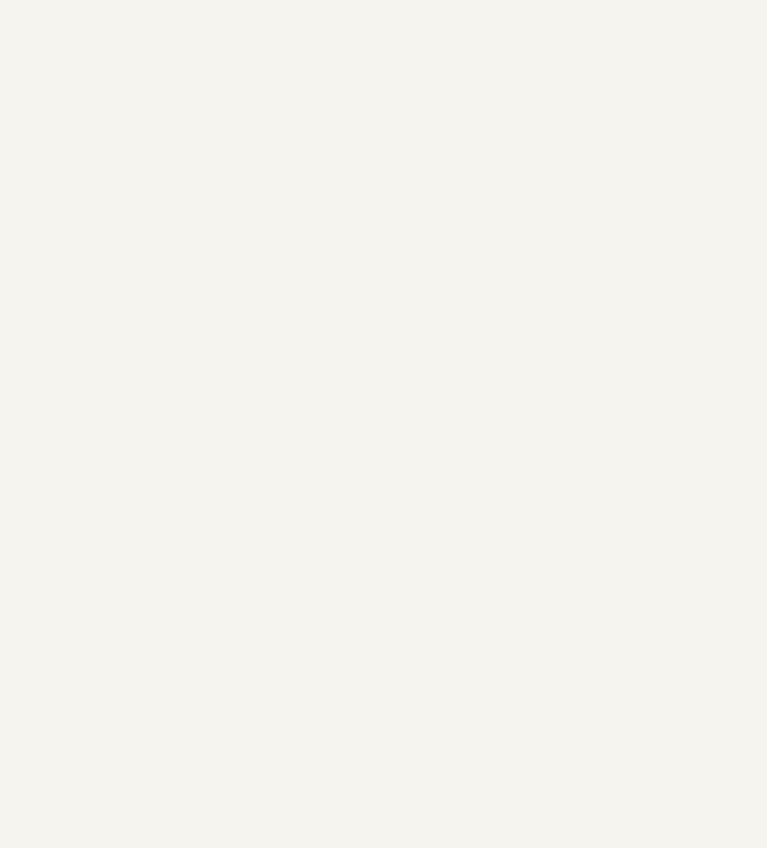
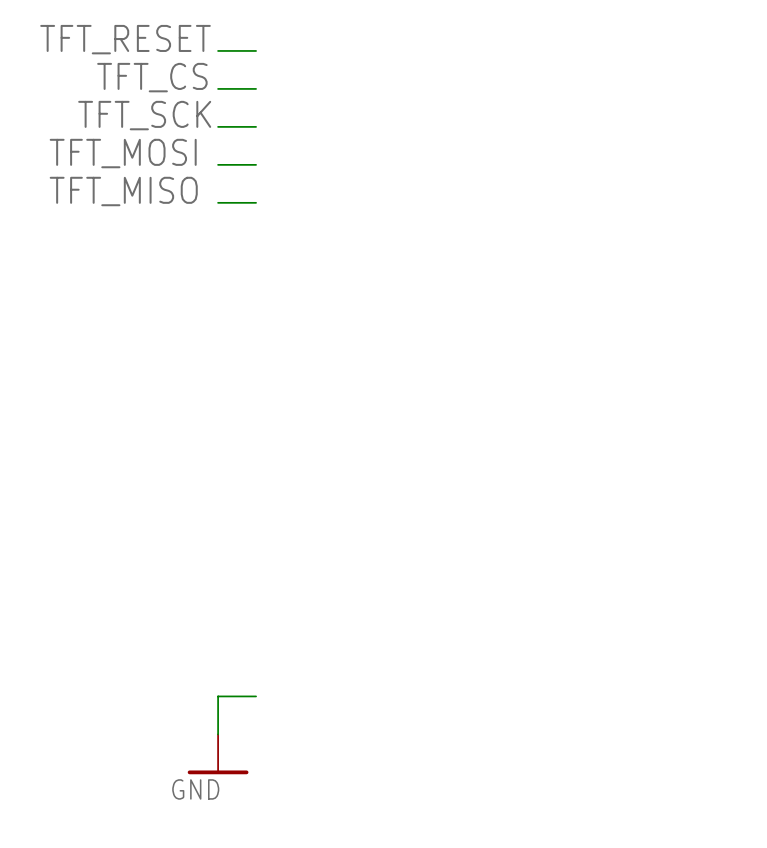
label: none -> TFT_RESET (125, 39)
wire: none -> (218, 50) (256, 50)
label: none -> TFT_CS (152, 77)
wire: none -> (218, 88) (256, 88)
label: none -> TFT_SCK (144, 115)
wire: none -> (218, 126) (256, 126)
label: none -> TFT_MOSI (123, 153)
wire: none -> (218, 164) (256, 164)
label: none -> TFT_MISO (123, 191)
wire: none -> (218, 202) (256, 202)
wire: none -> (256, 696) (218, 696) (218, 734)
power symbol: none -> GND (218, 754)

